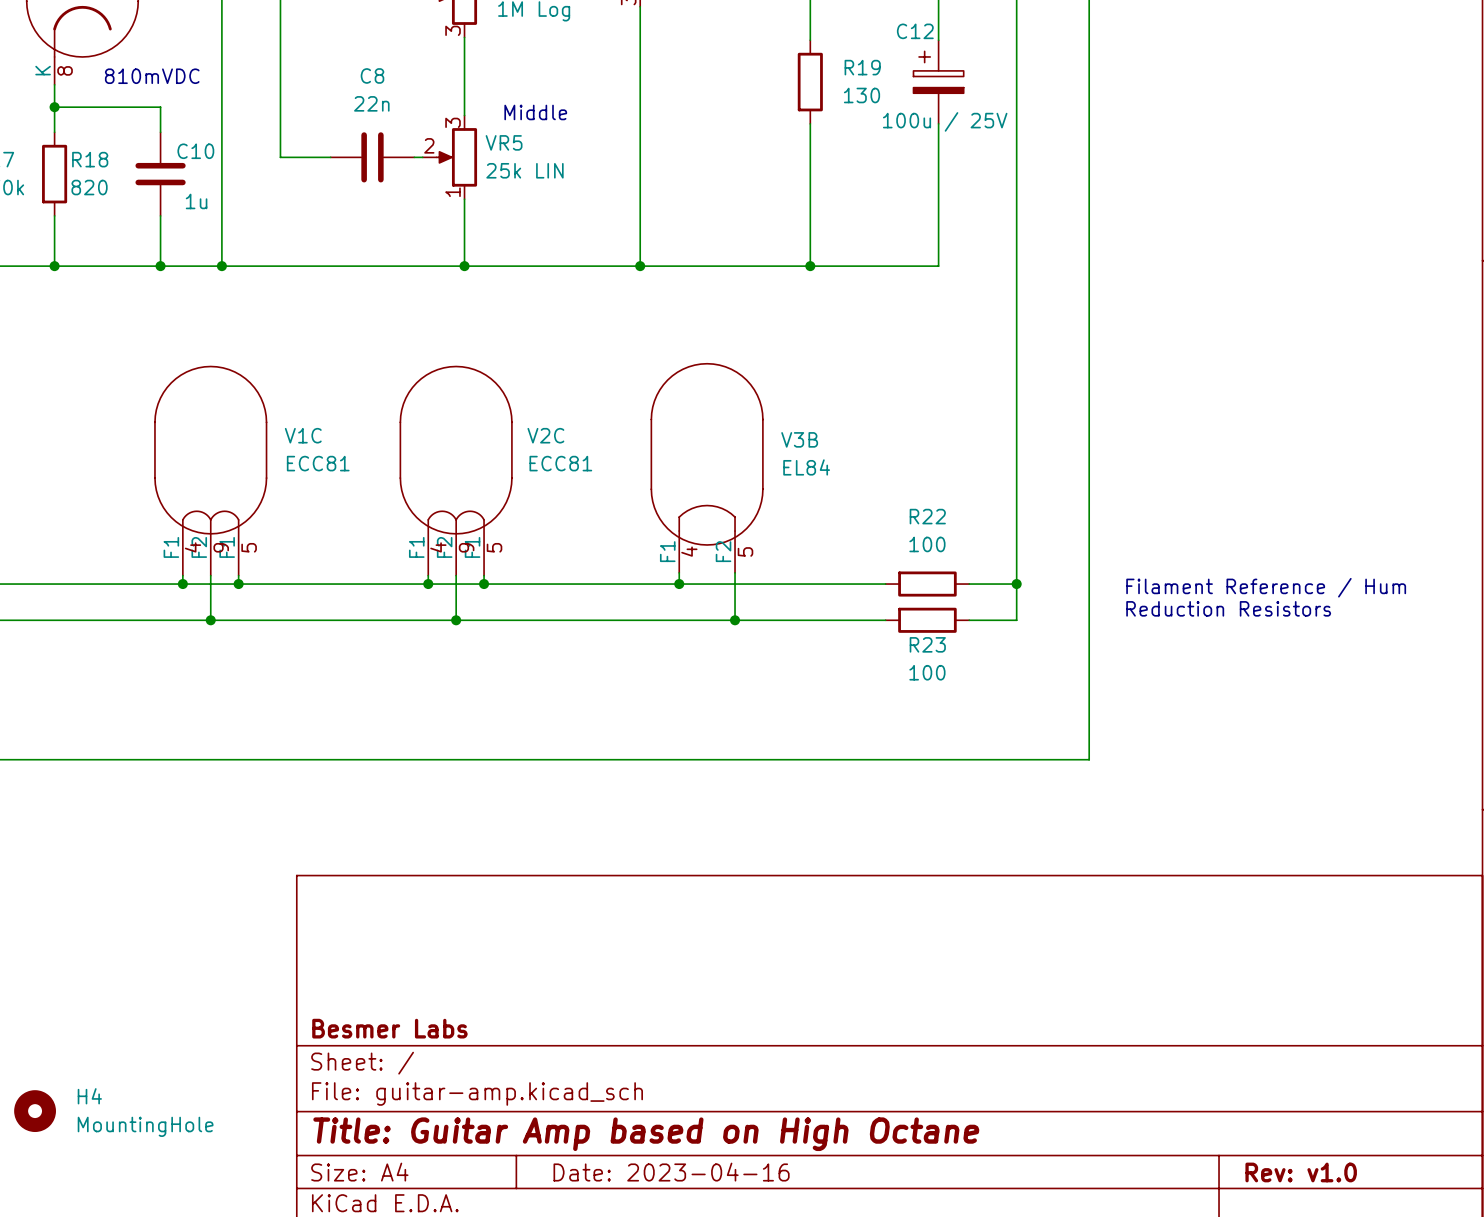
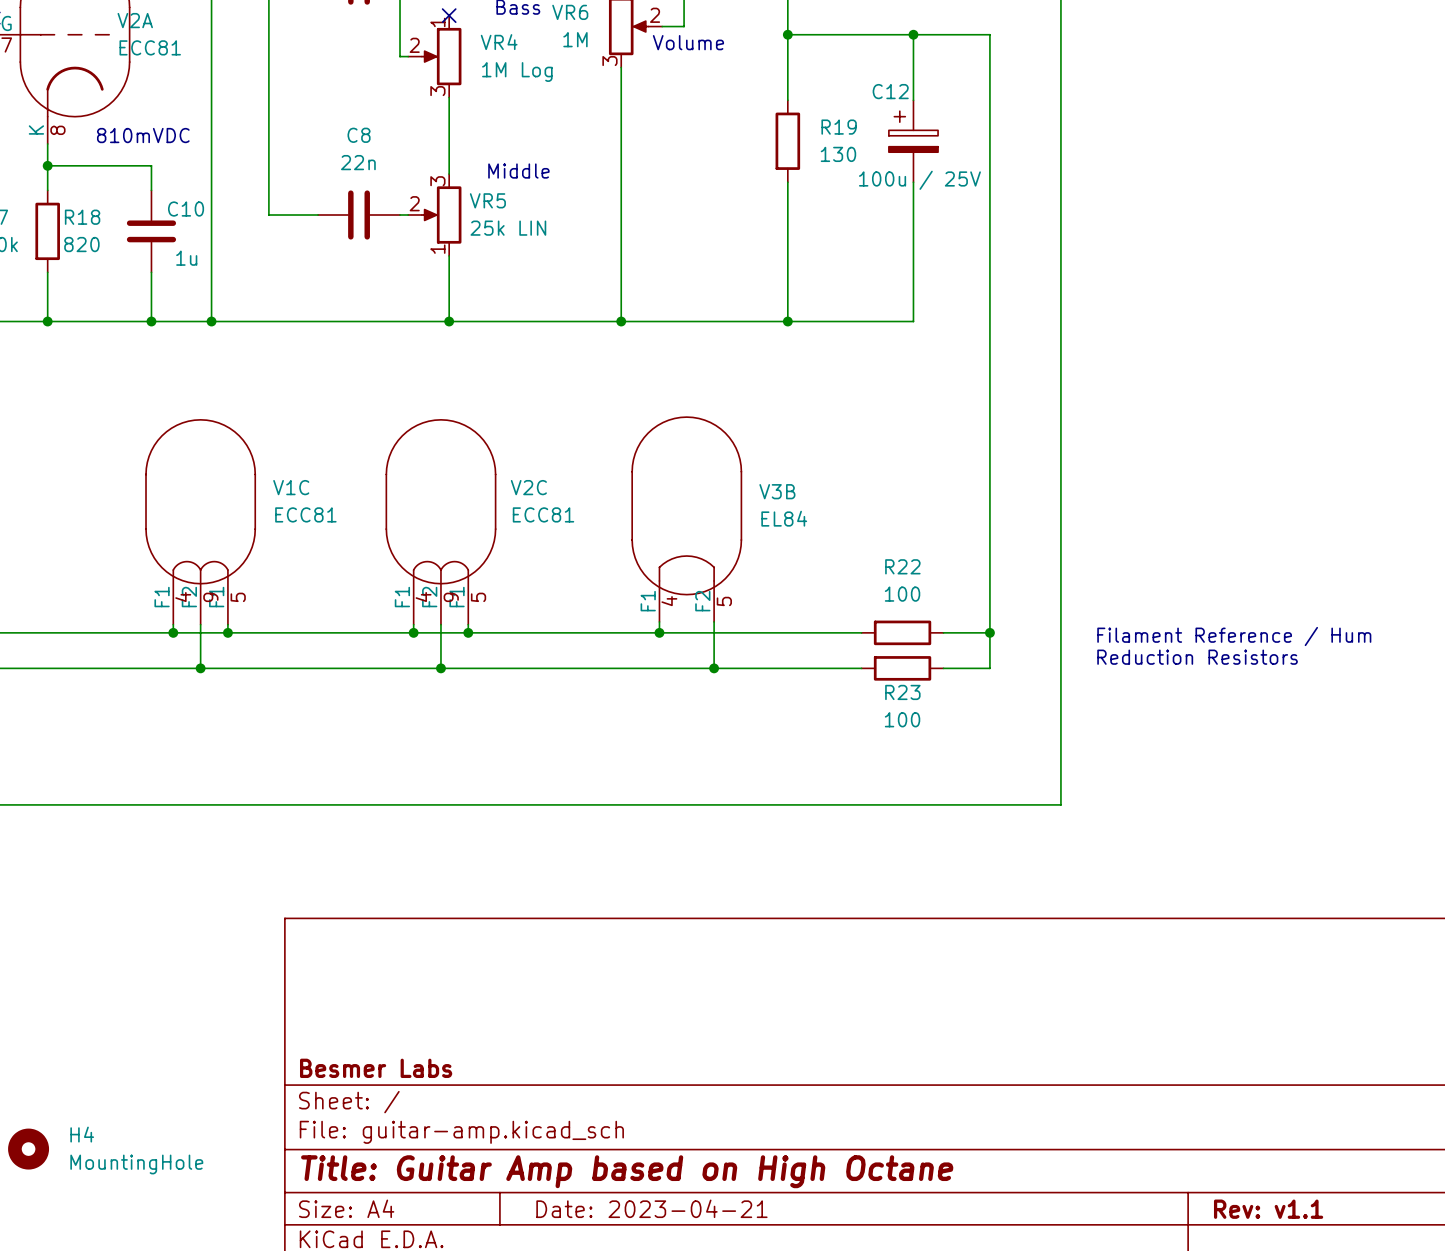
title block: Date: 2023-04-16 (671, 1172) -> Date: 2023-04-21 (651, 1208)
title block: Rev: v1.0 (1301, 1172) -> Rev: v1.1 (1268, 1209)

